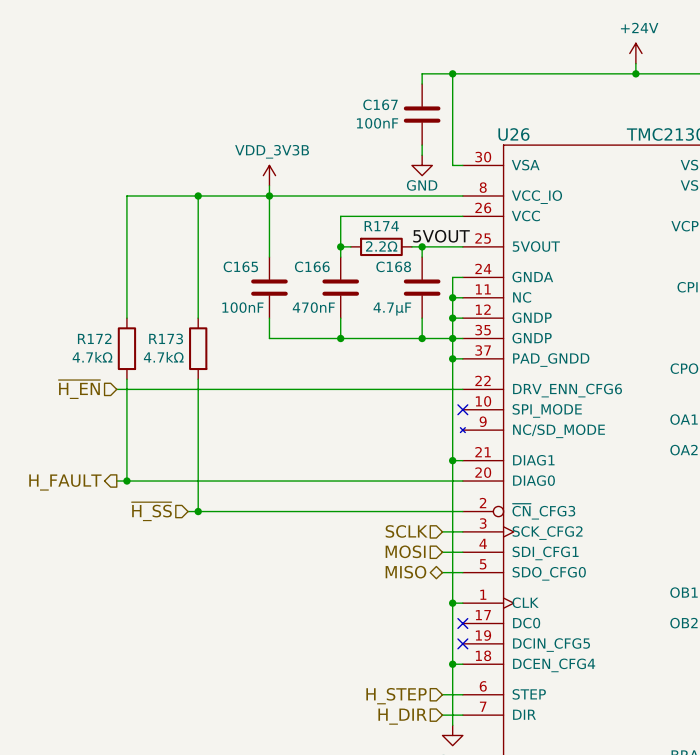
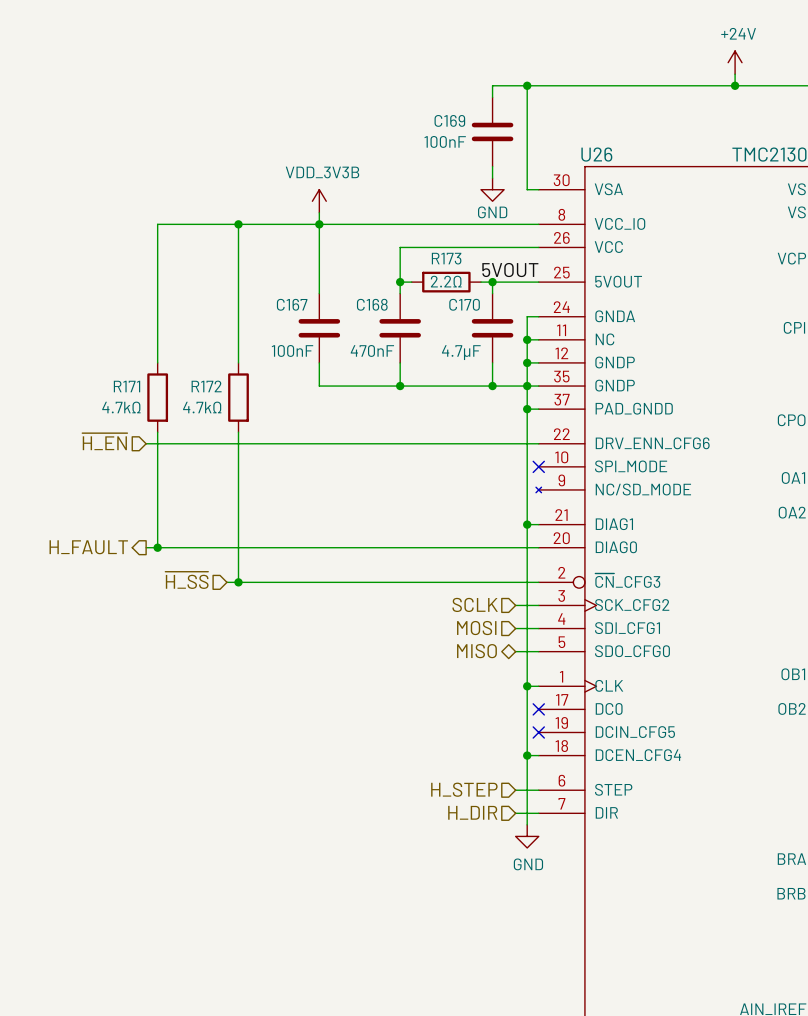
C167 name: C167 (380, 104) -> C169 (449, 120)
R174 name: R174 (381, 226) -> R173 (446, 258)
C165 name: C165 (240, 266) -> C167 (292, 304)
C166 name: C166 (312, 266) -> C168 (372, 304)
C168 name: C168 (393, 266) -> C170 (464, 304)
R172 name: R172 (94, 338) -> R171 (127, 386)
R173 name: R173 (166, 338) -> R172 (206, 386)

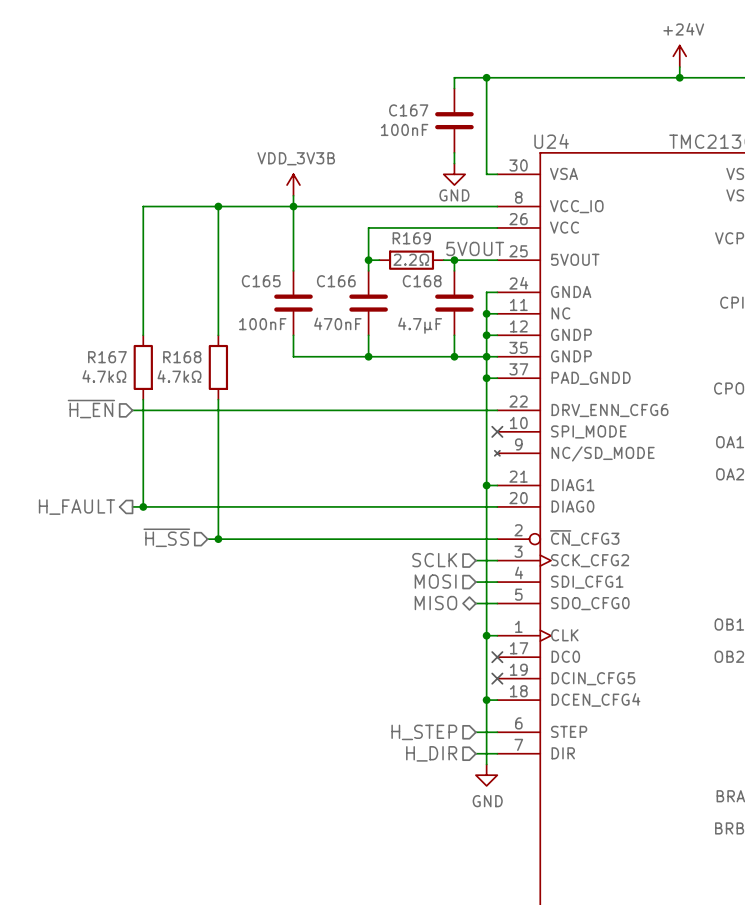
C169 name: C169 (449, 120) -> C167 (408, 110)
U26 name: U26 (596, 154) -> U24 (551, 141)
R173 name: R173 (446, 258) -> R169 (411, 238)
C167 name: C167 (292, 304) -> C165 (261, 281)
C168 name: C168 (372, 304) -> C166 (336, 281)
C170 name: C170 (464, 304) -> C168 (422, 281)
R171 name: R171 (127, 386) -> R167 (107, 357)
R172 name: R172 (206, 386) -> R168 (182, 357)

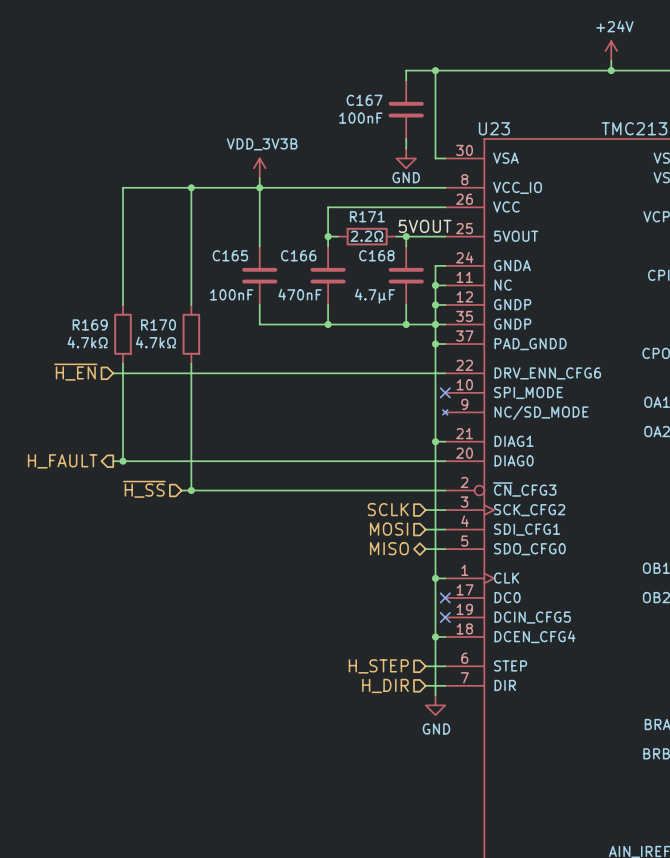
U24 name: U24 (551, 141) -> U23 (494, 128)
R169 name: R169 (411, 238) -> R171 (367, 216)
R167 name: R167 (107, 357) -> R169 (90, 324)
R168 name: R168 (182, 357) -> R170 (158, 324)

